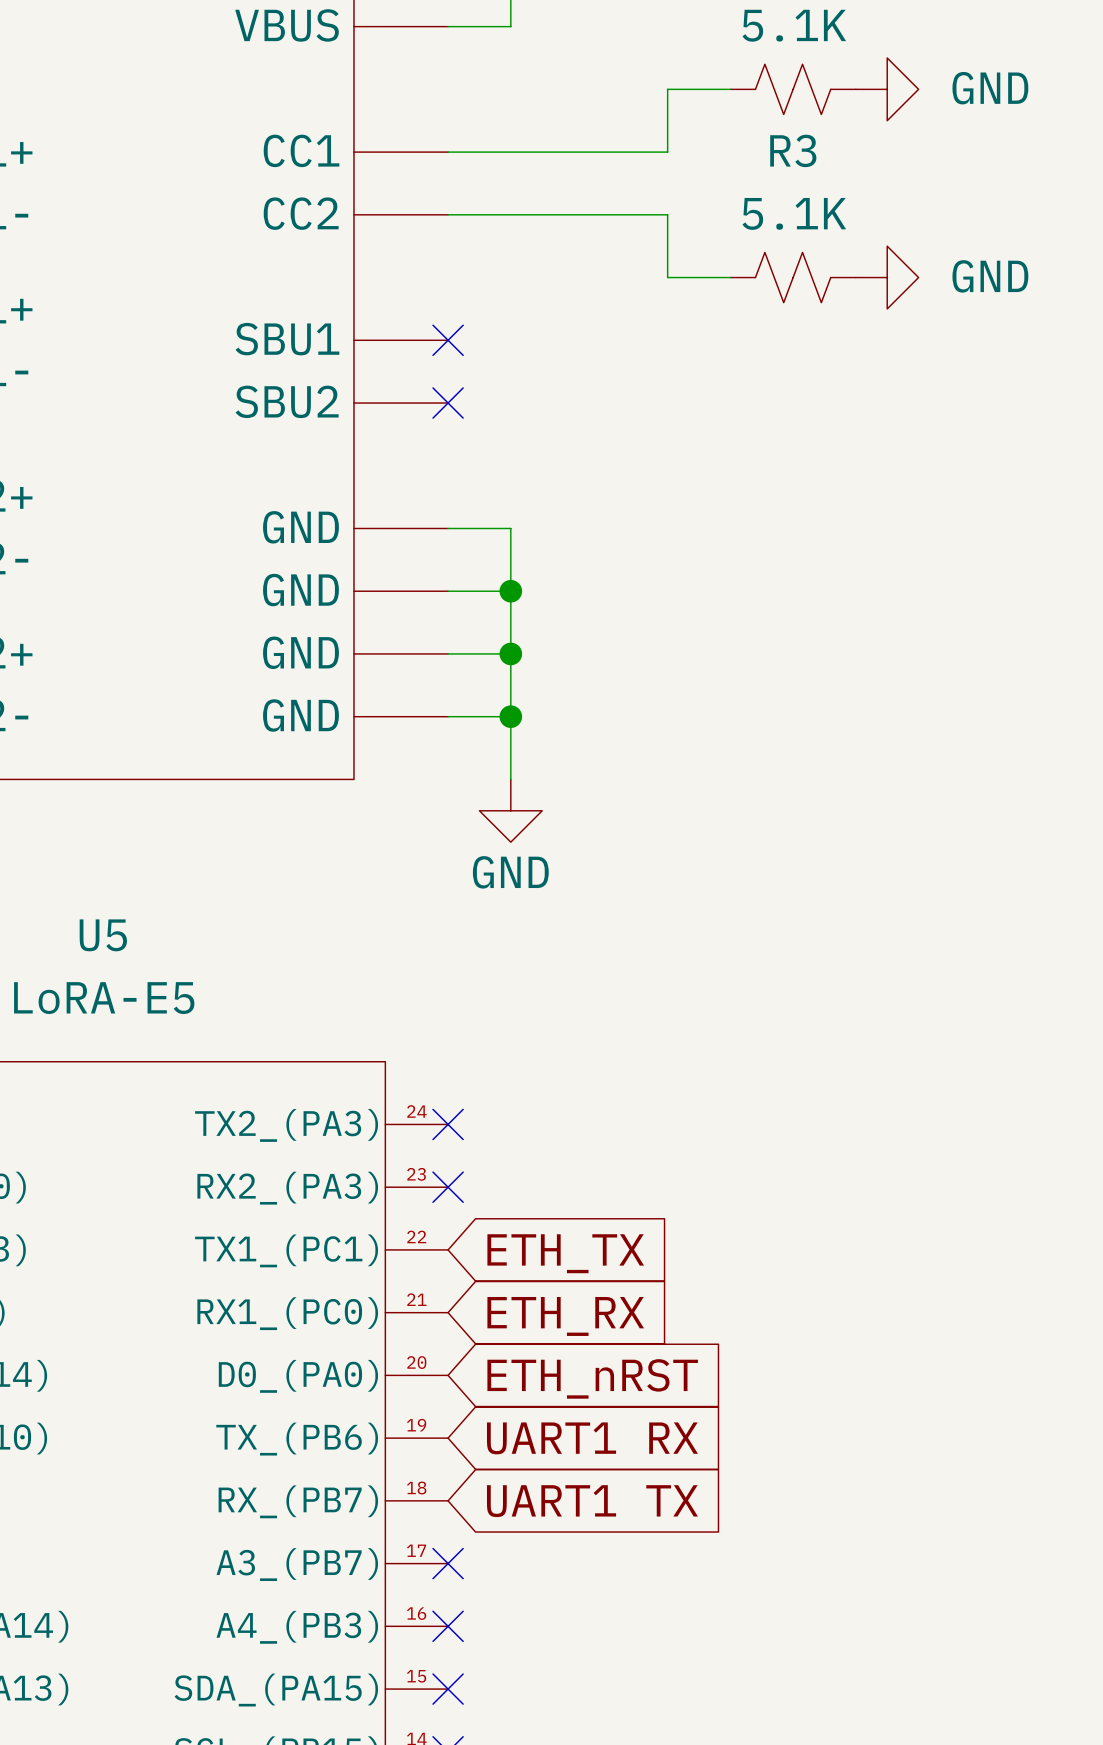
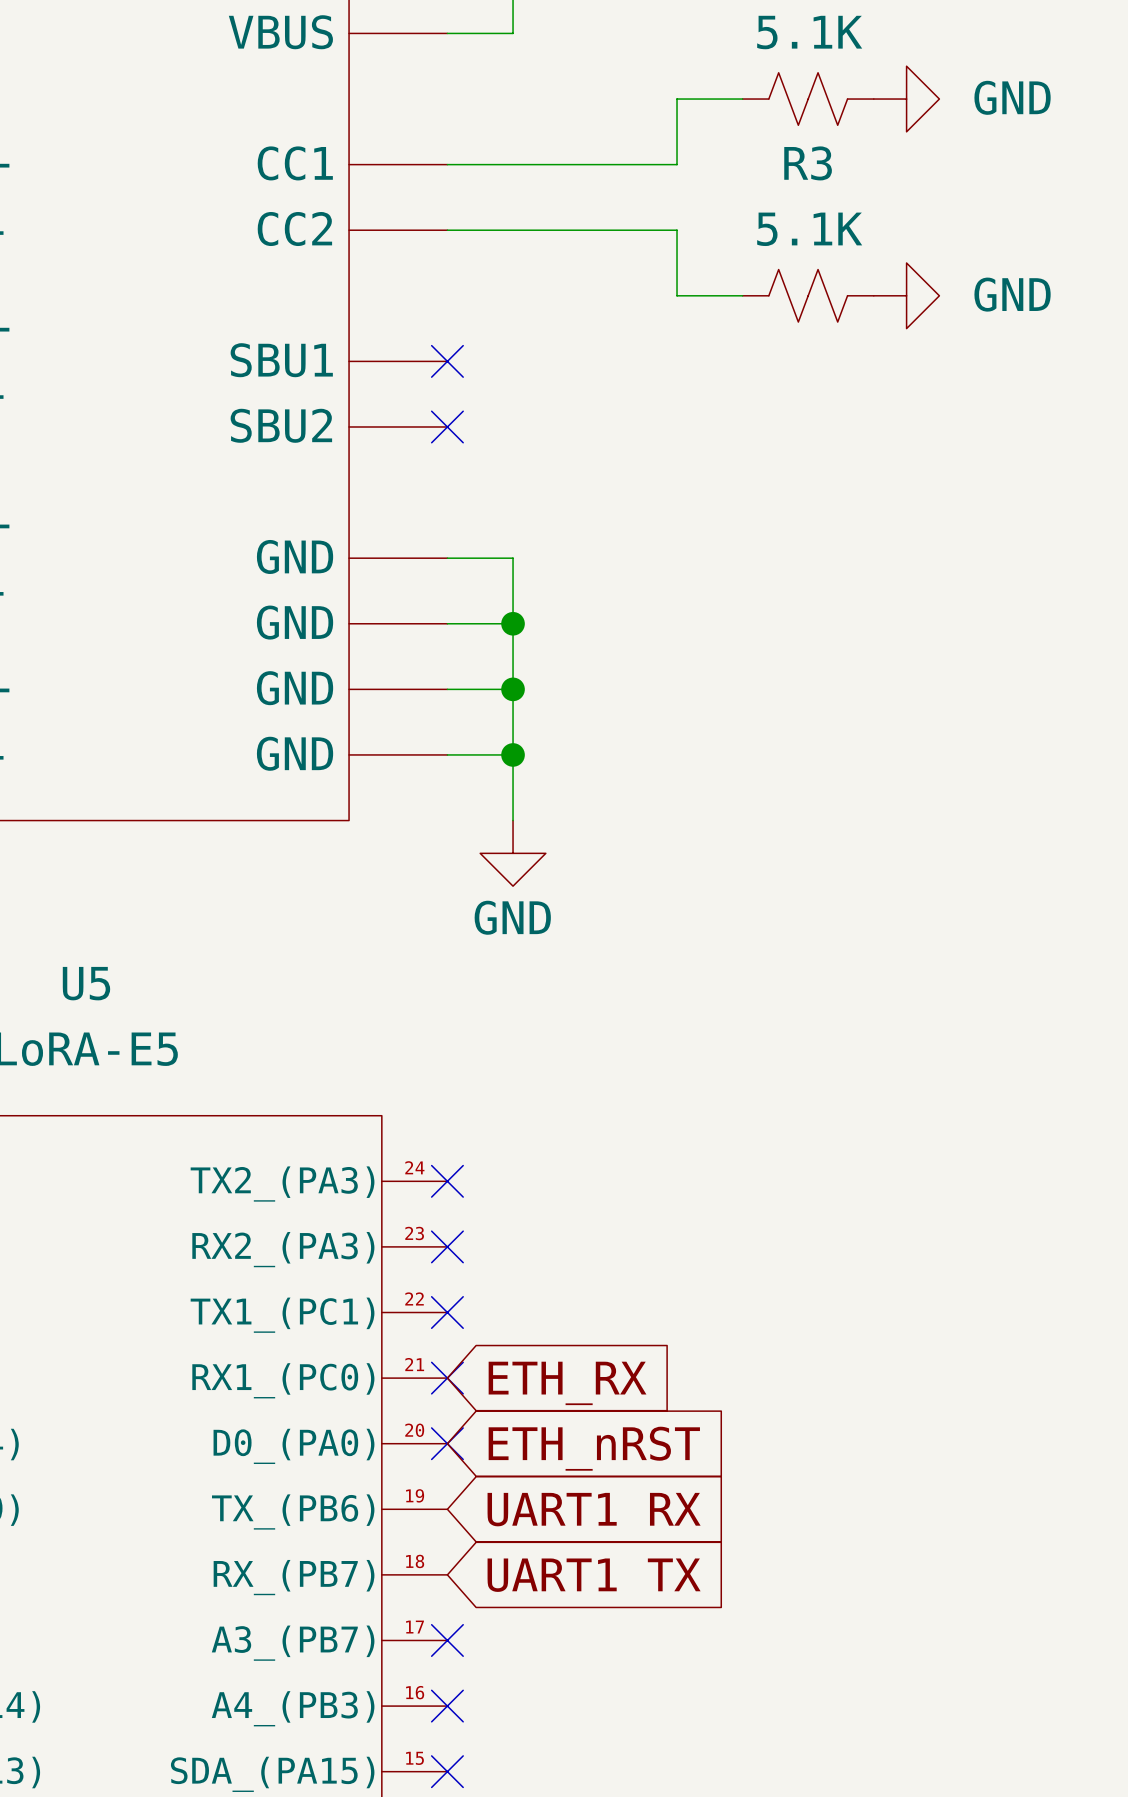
no-connect mark: none -> (447, 1312)
global label: ETH_TX (565, 1253) -> none
no-connect mark: none -> (447, 1378)
no-connect mark: none -> (447, 1443)

